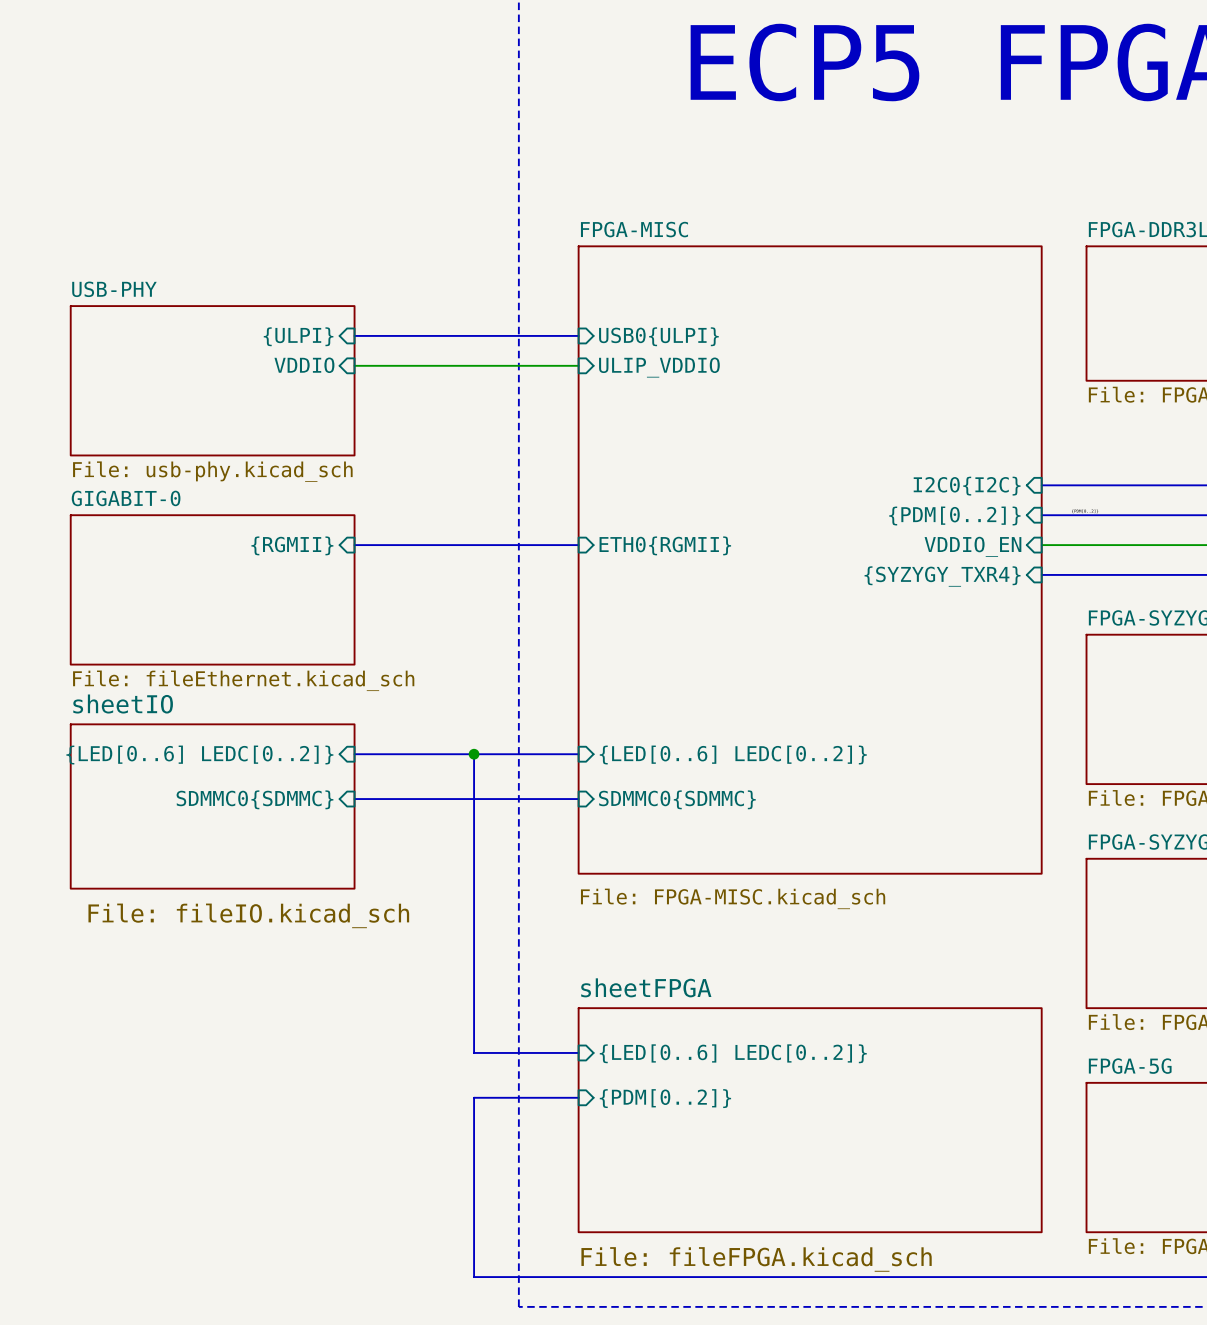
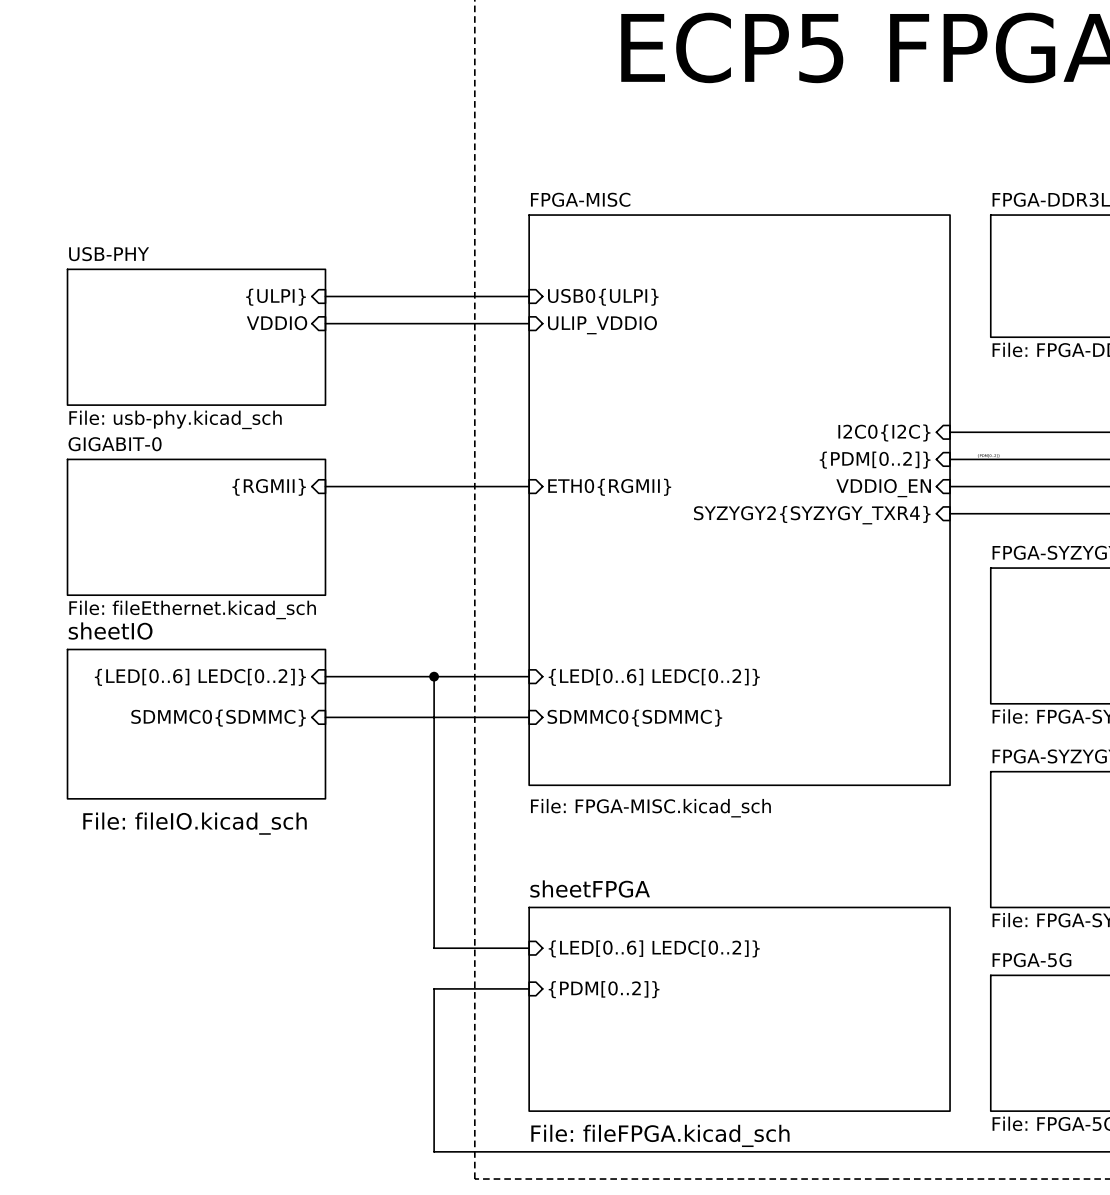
sheet pin: {SYZYGY_TXR4} (942, 576) -> SYZYGY2{SYZYGY_TXR4} (812, 515)

